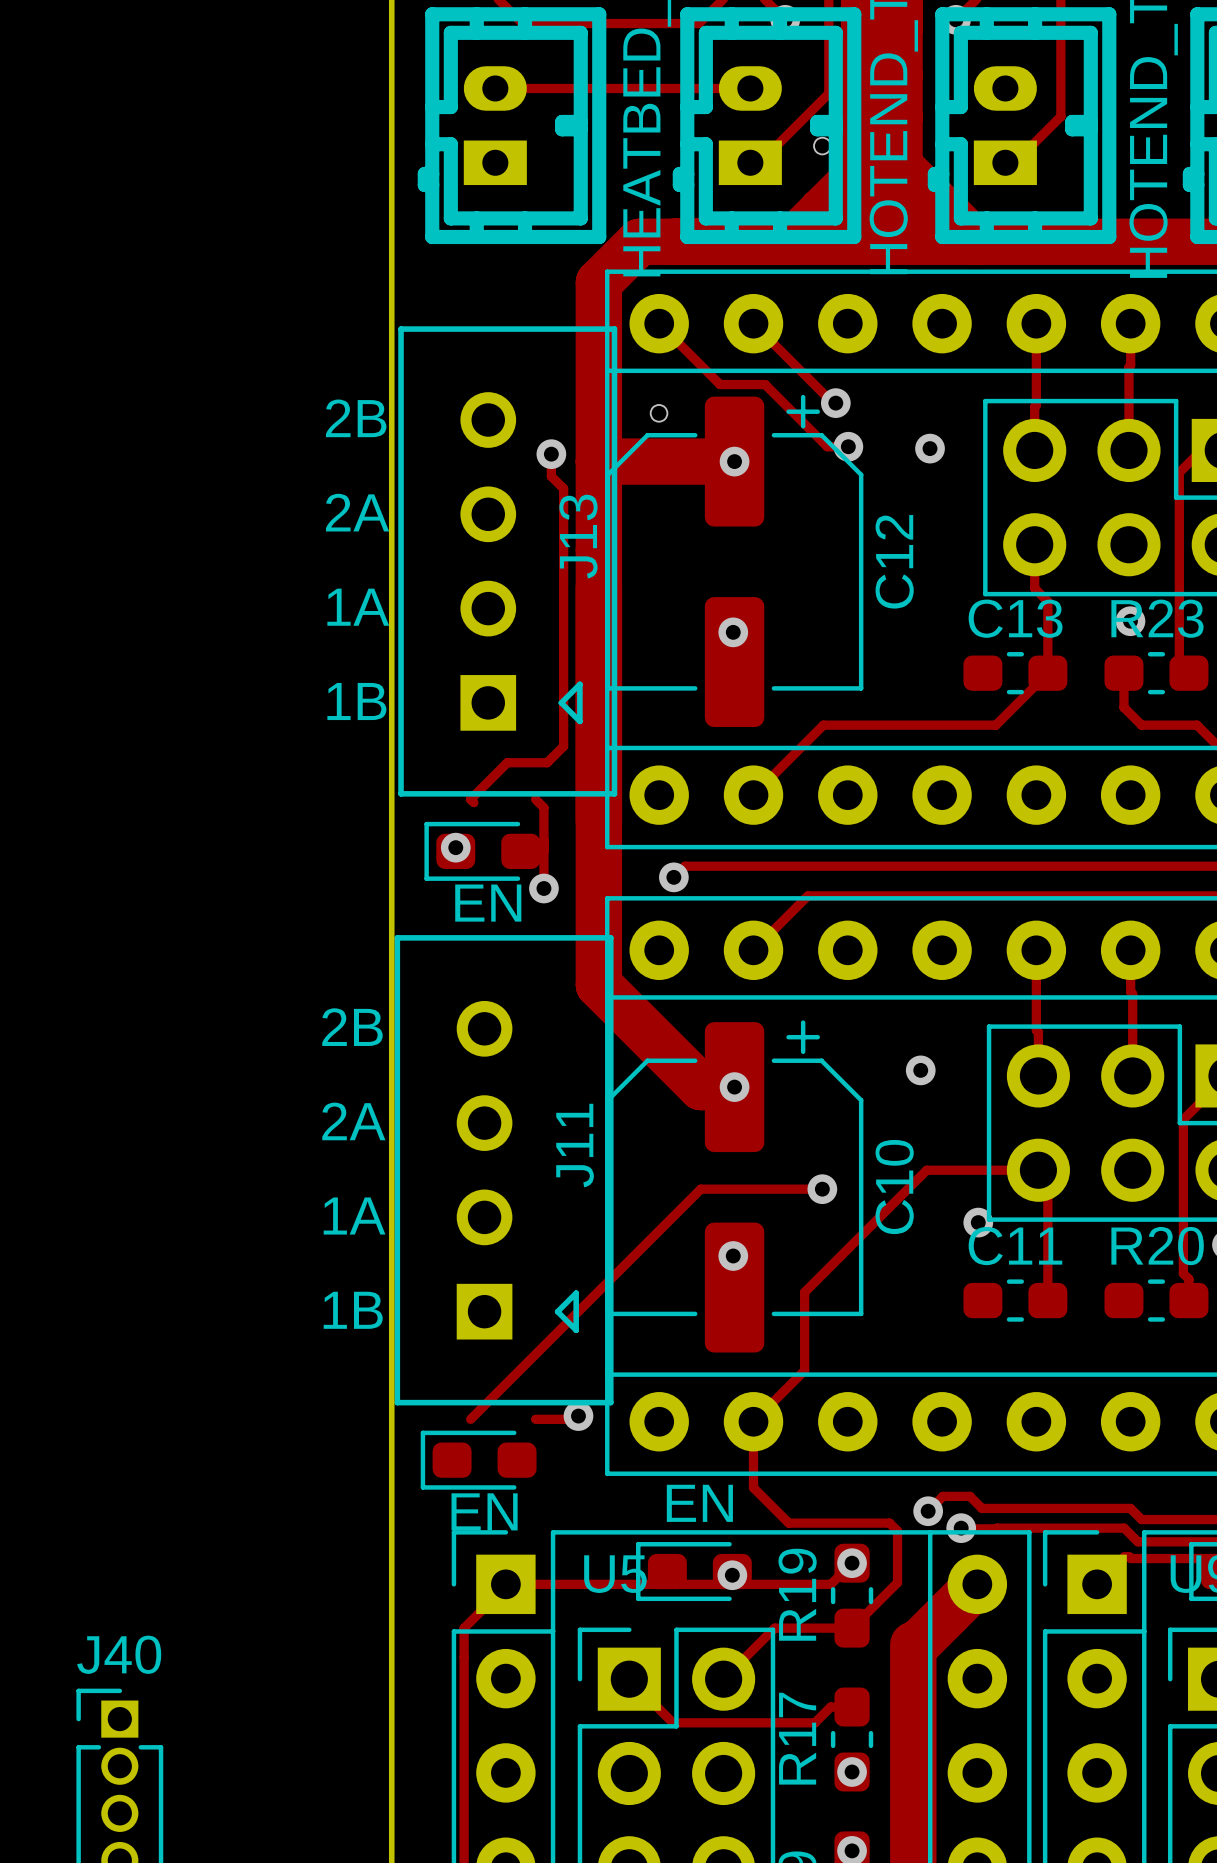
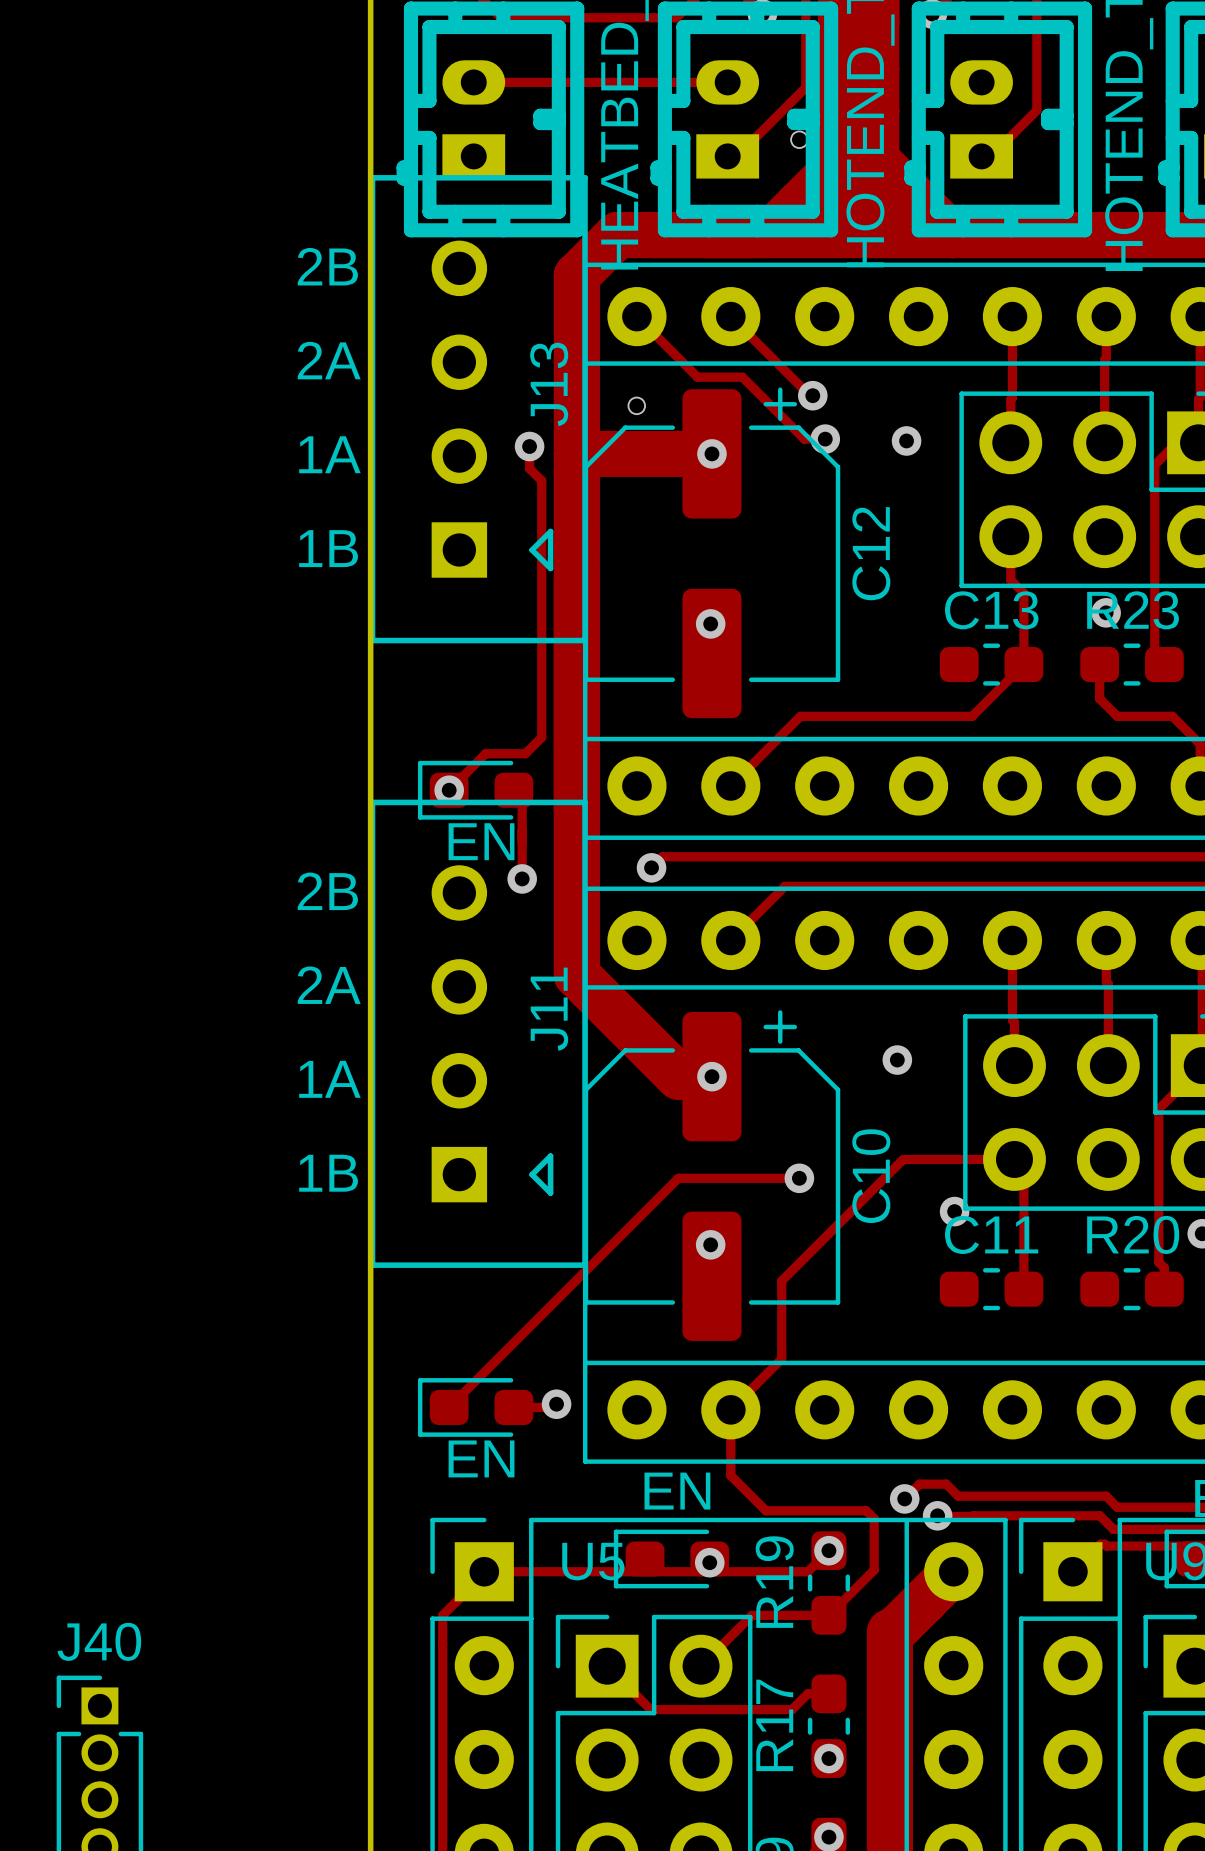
J13 position: (507, 561) -> (478, 409)
via position: (455, 847) -> (449, 790)
part position: (482, 851) -> (475, 790)
J11 position: (504, 1170) -> (478, 1033)
part position: (478, 1460) -> (475, 1407)

